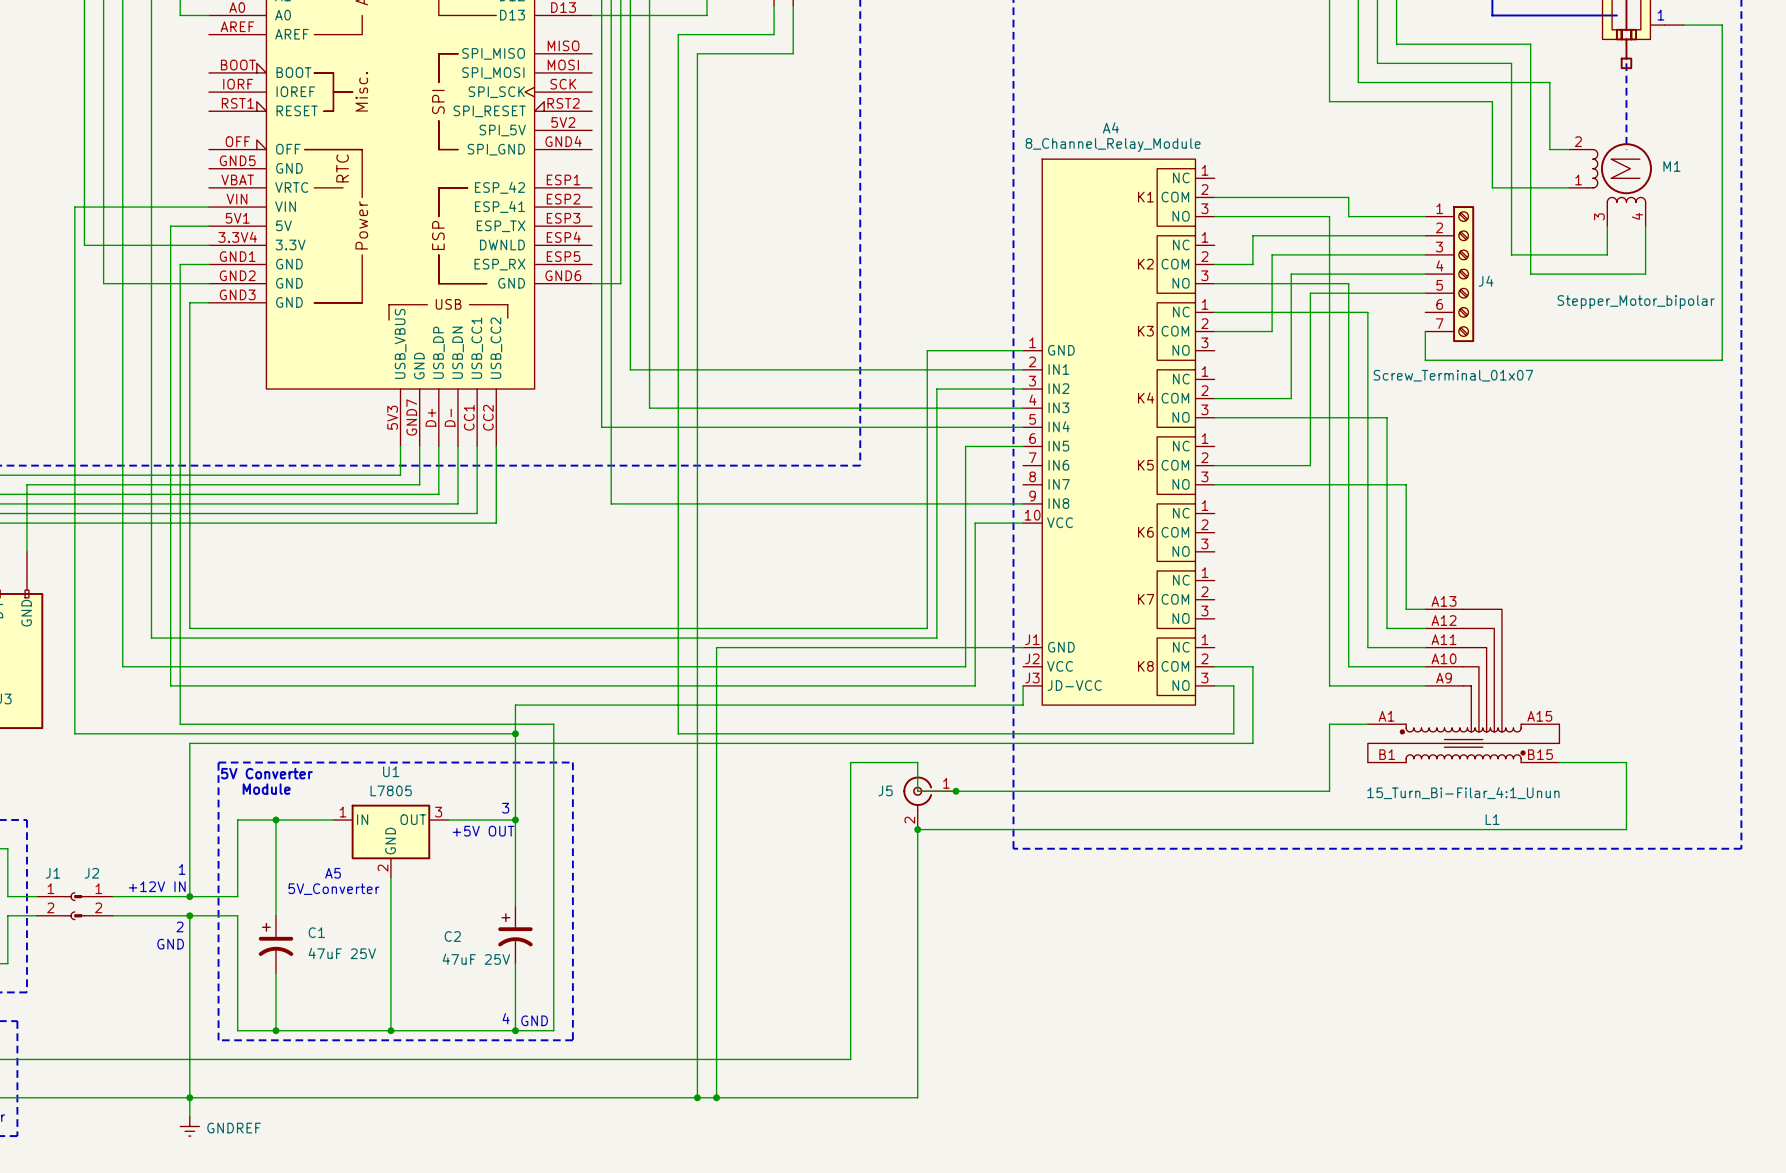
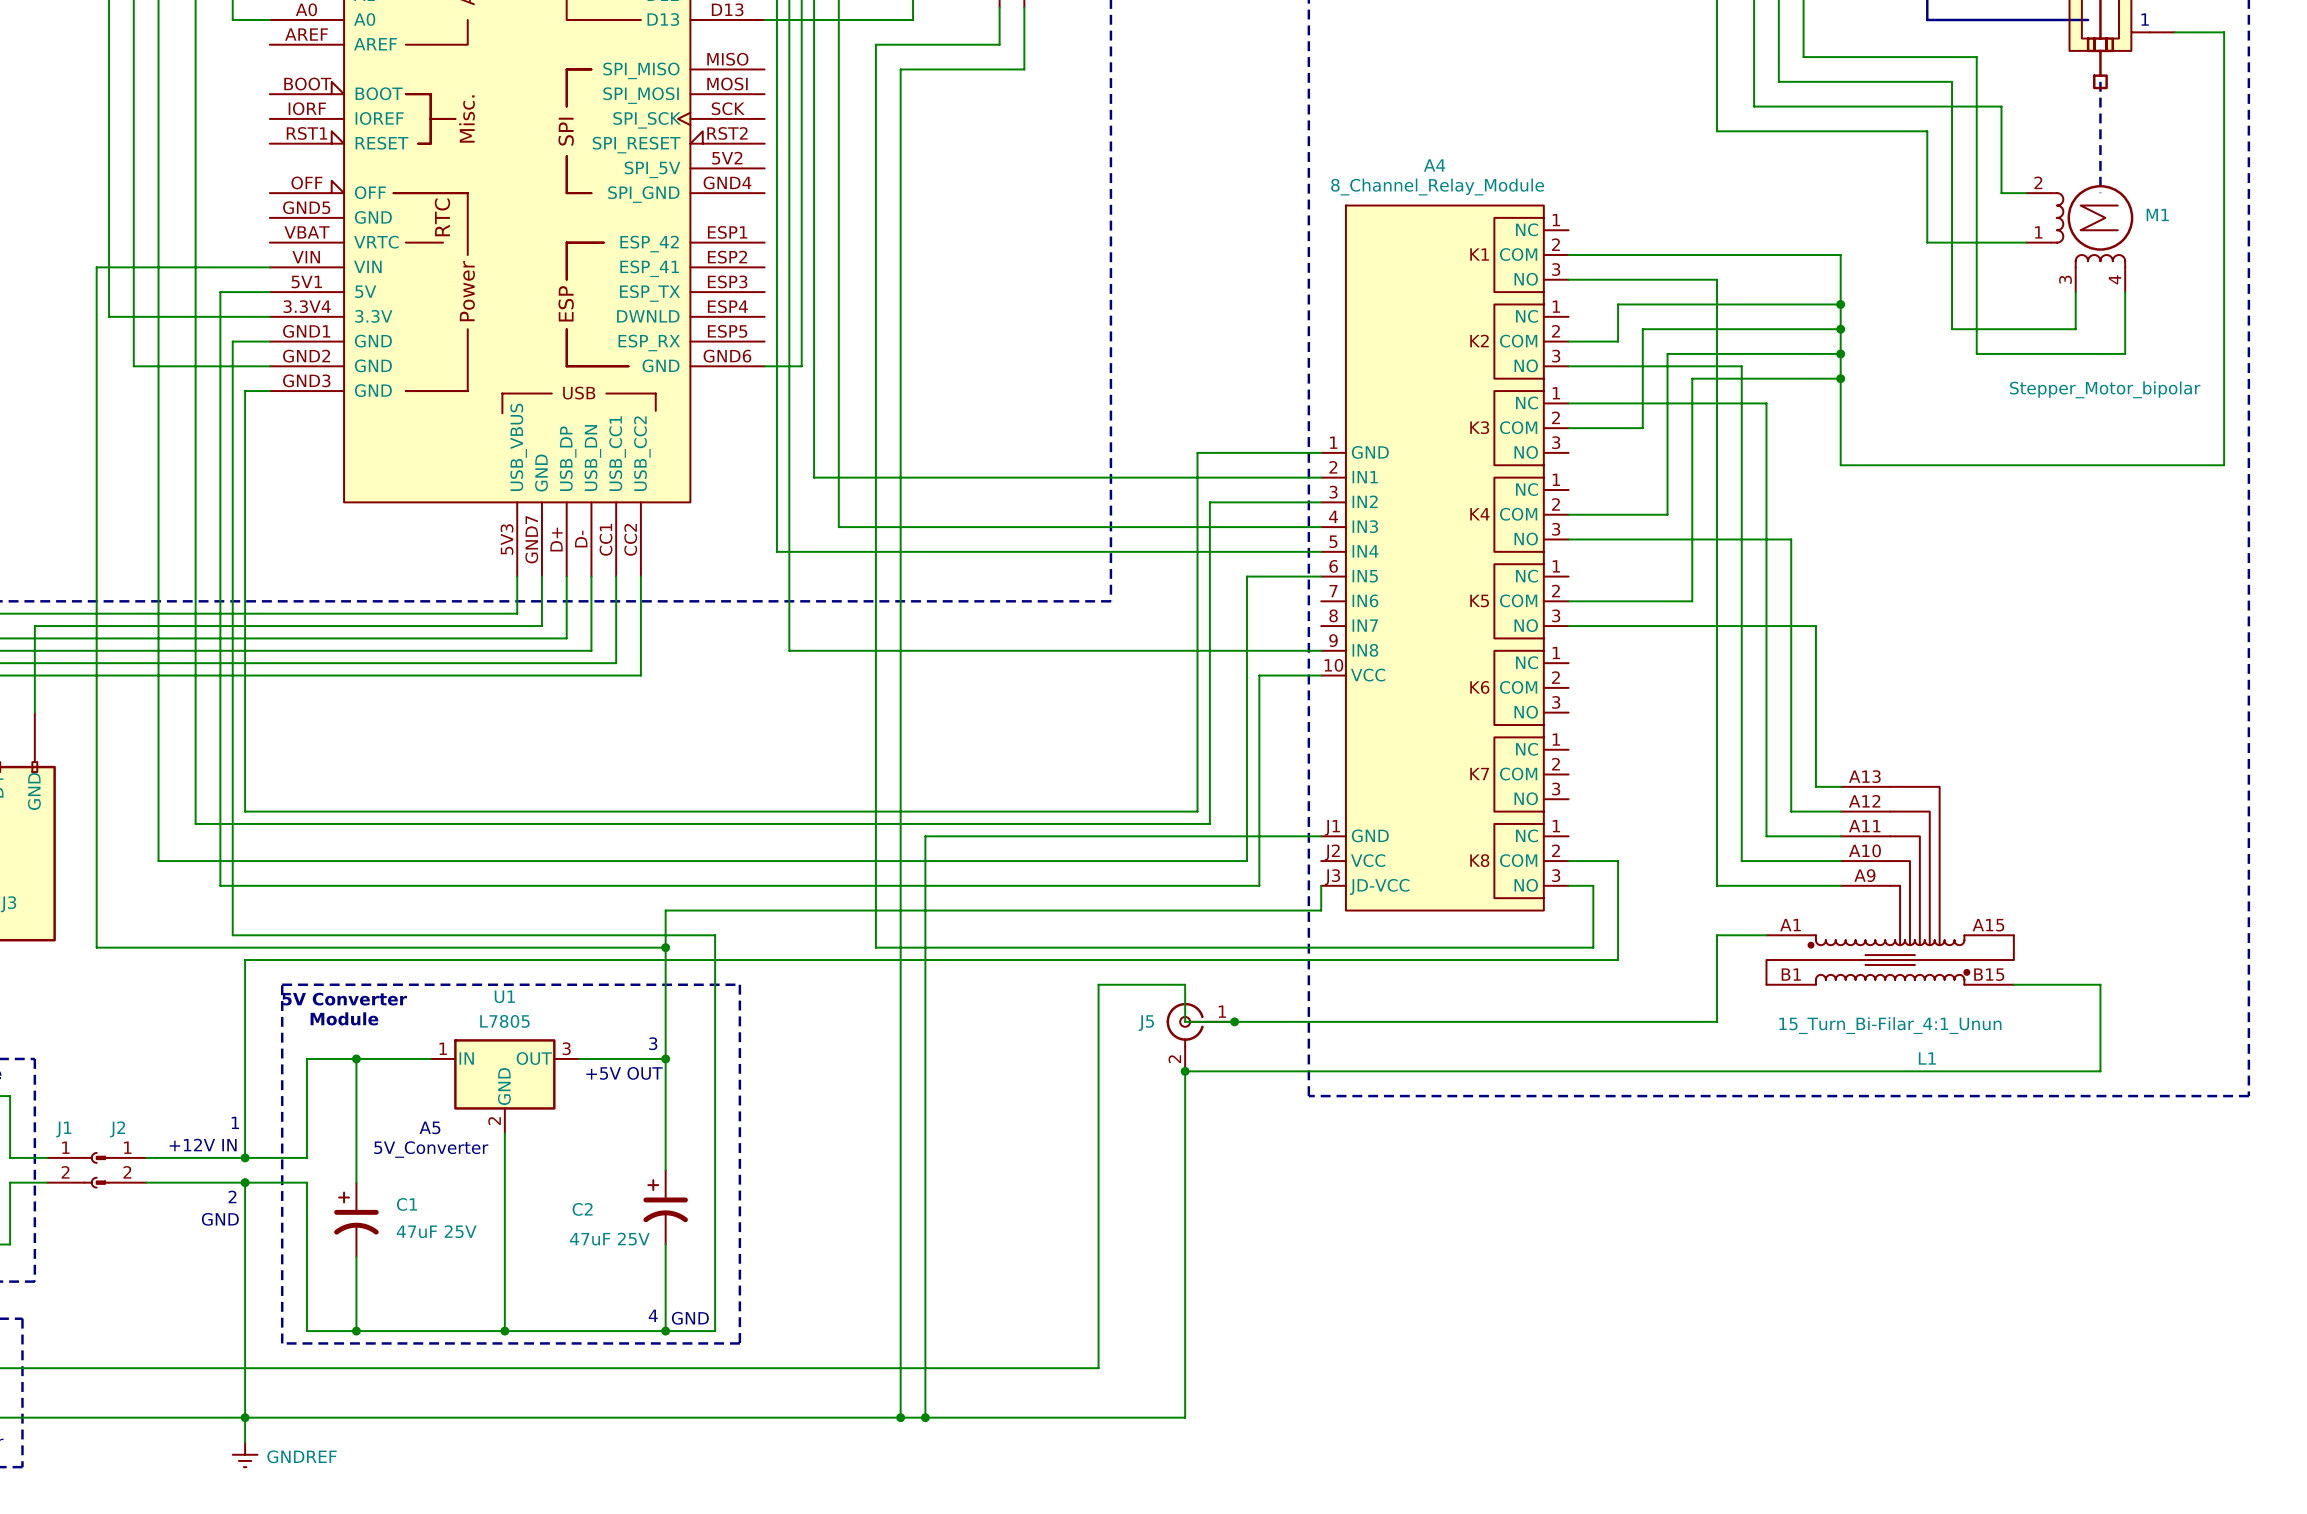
wire: (1348, 197) (1348, 216) (1425, 216) -> (1741, 254) (1840, 254) (1840, 428)
junction: none -> (1840, 304)
junction: none -> (1840, 329)
junction: none -> (1840, 353)
J4: Screw_Terminal_01x07 (1449, 274) -> none
junction: none -> (1840, 378)

